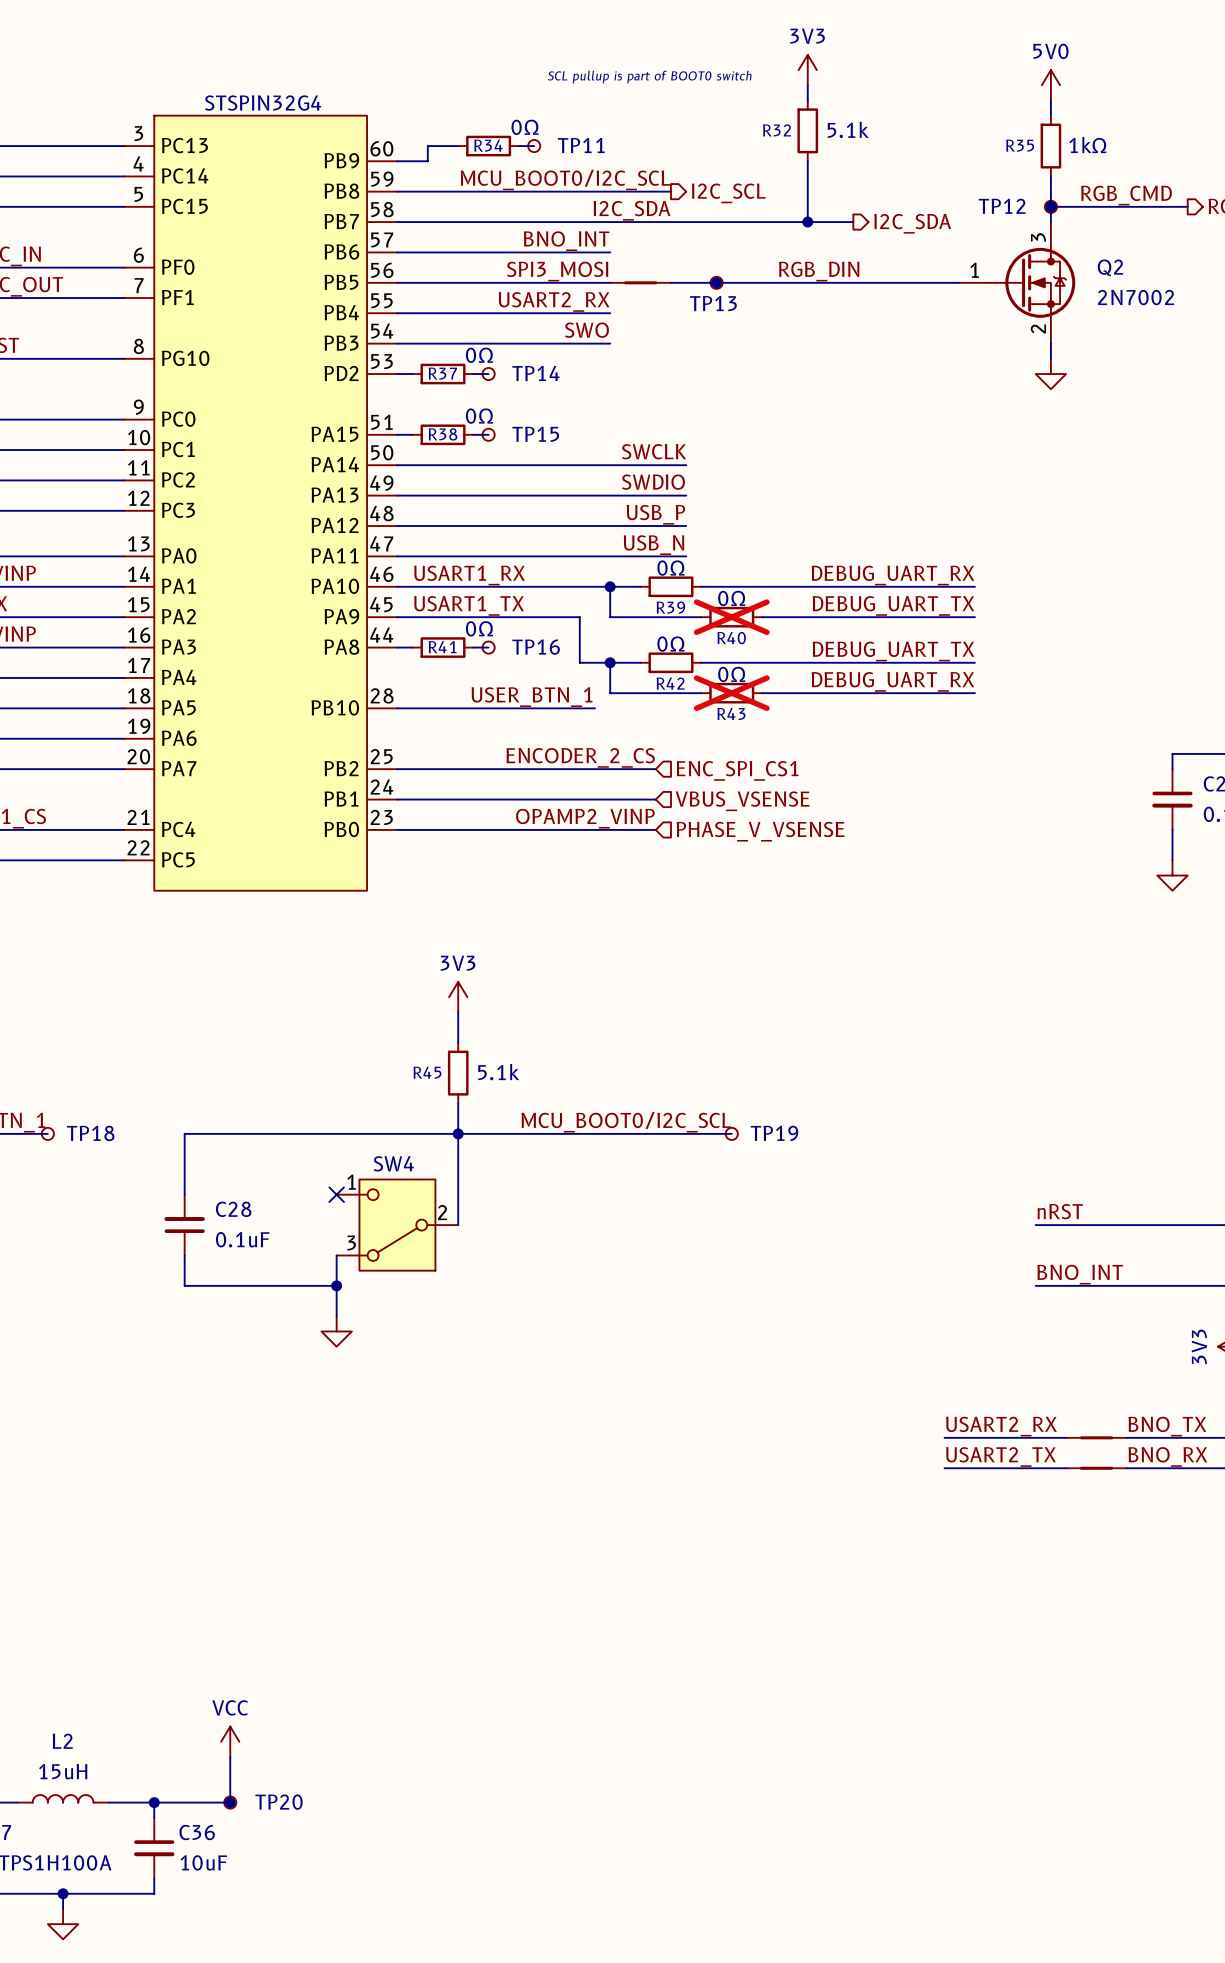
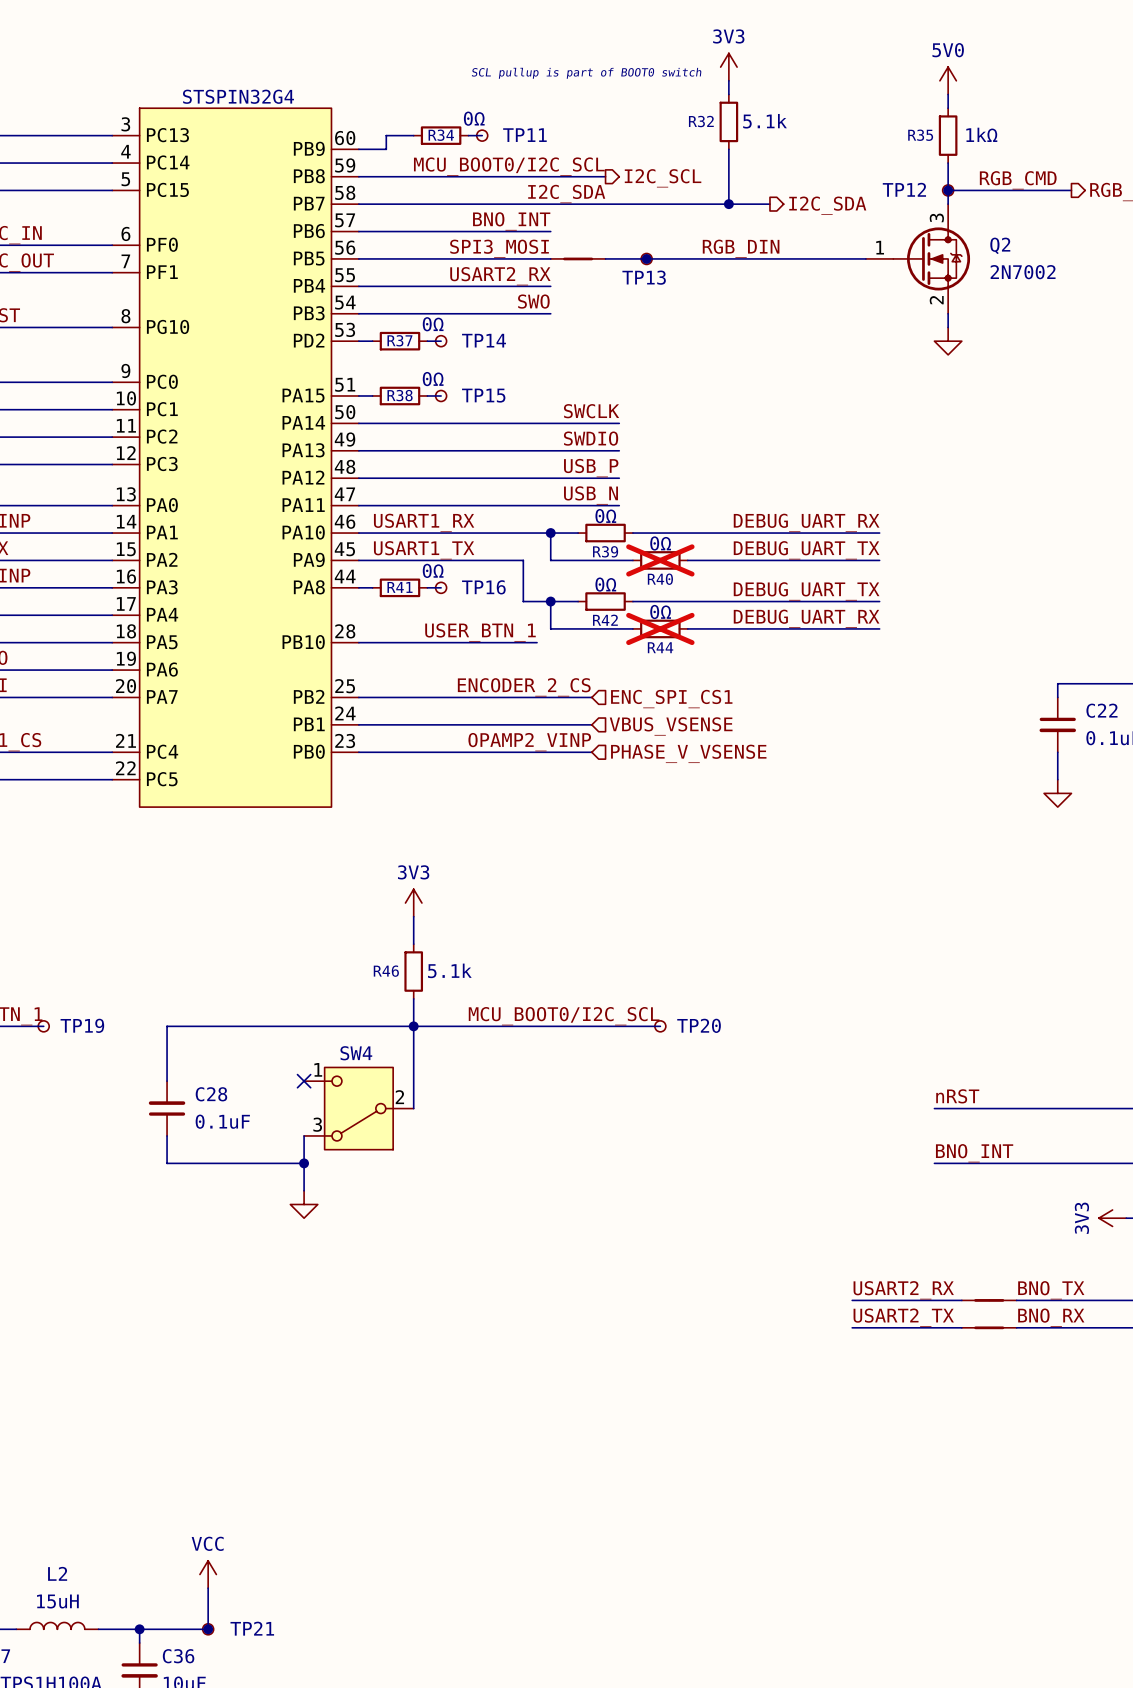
R43 name: R43 (731, 713) -> R44 (660, 647)
R45 name: R45 (427, 1072) -> R46 (386, 971)
TP18 name: TP18 (90, 1133) -> TP19 (82, 1025)
TP19 name: TP19 (774, 1133) -> TP20 (699, 1025)
TP20 name: TP20 (279, 1802) -> TP21 (252, 1628)

